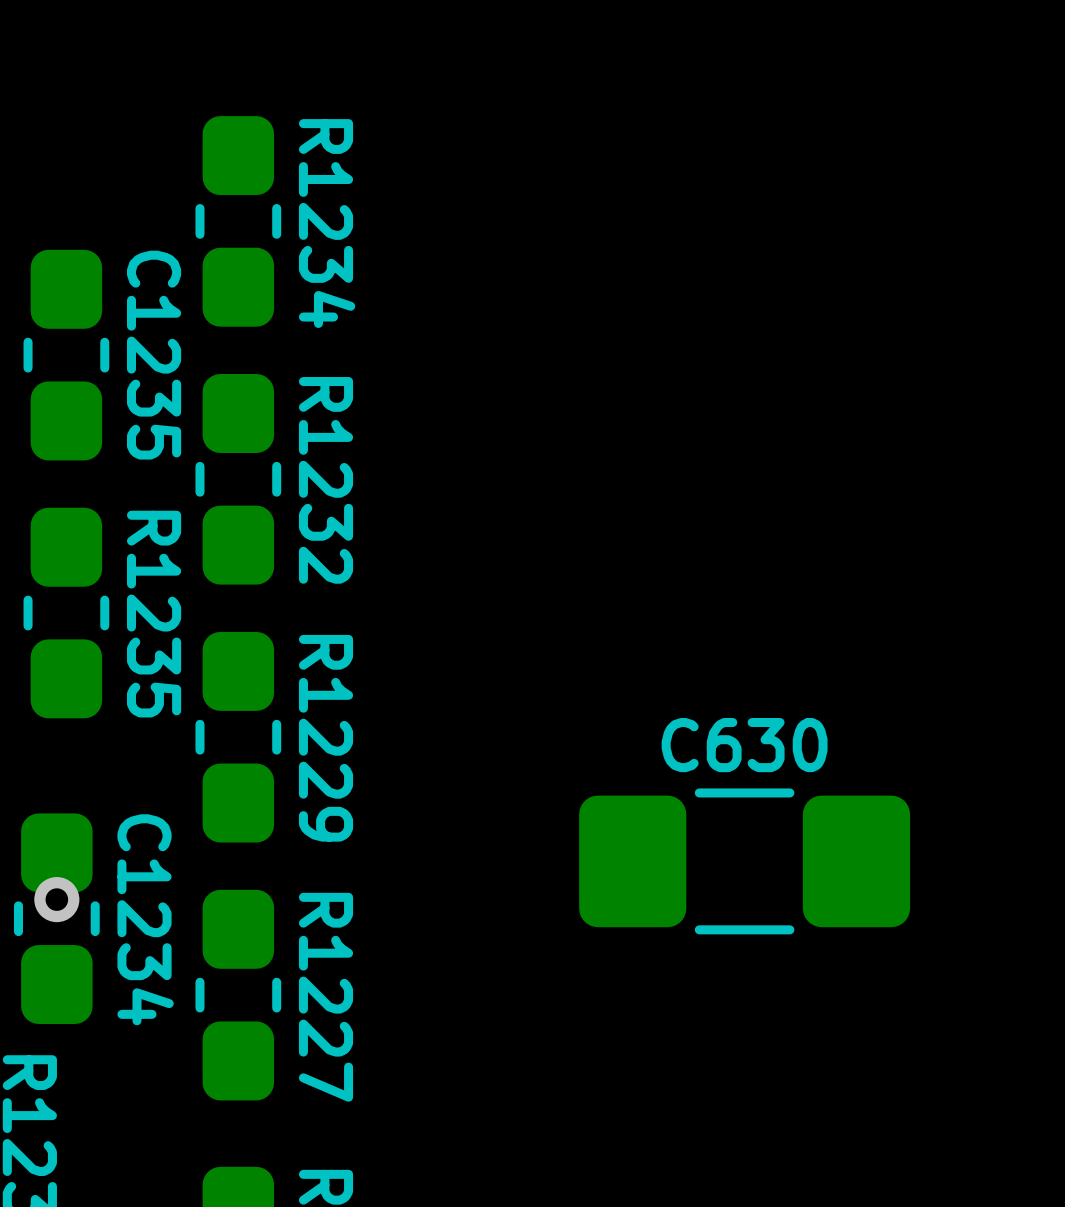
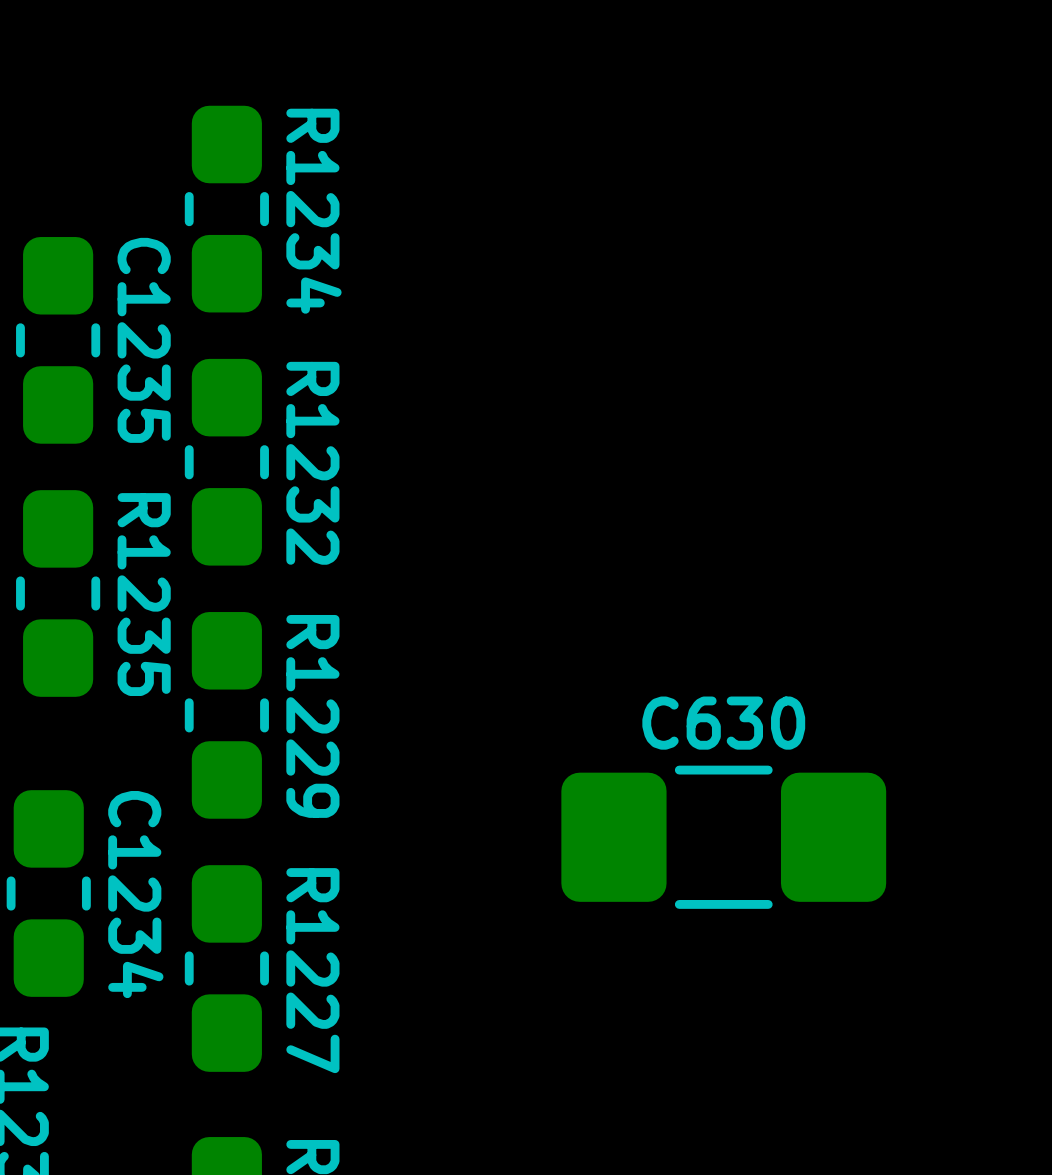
via: (56, 899) -> none

